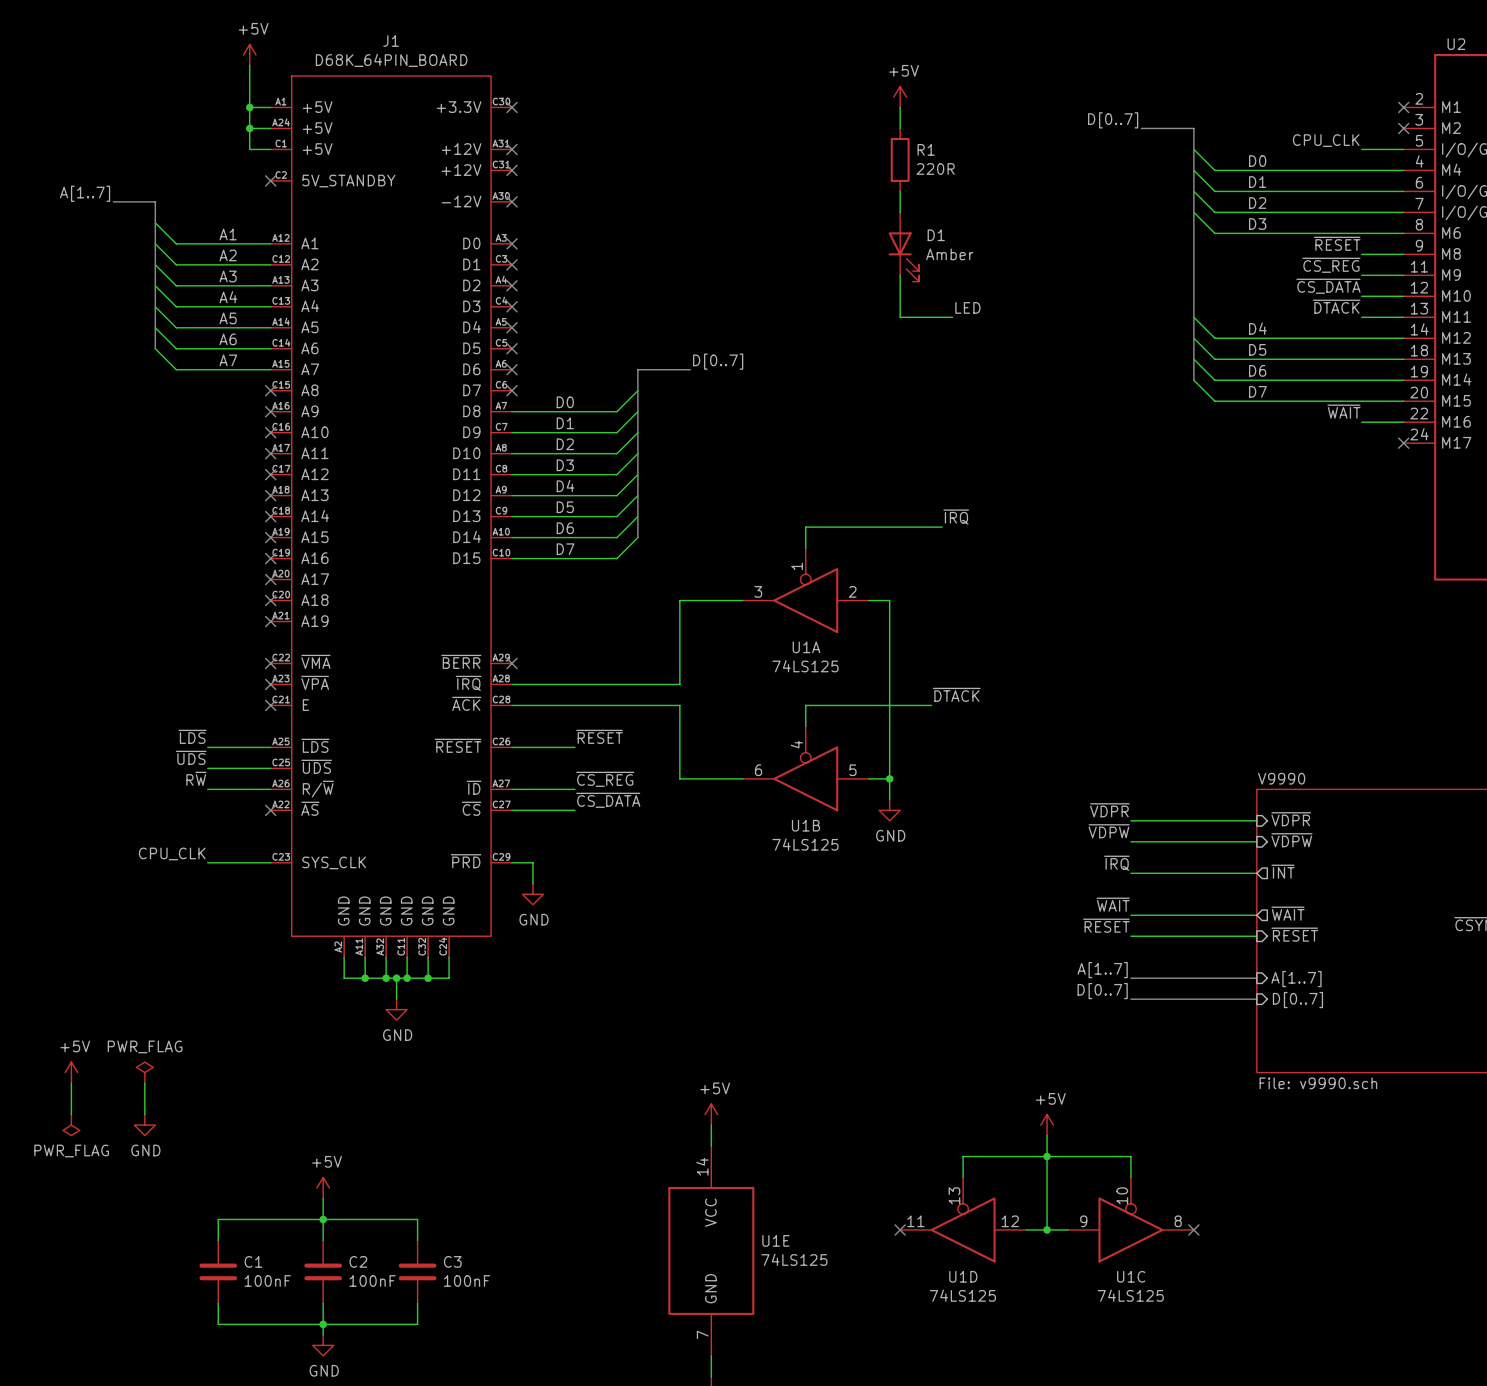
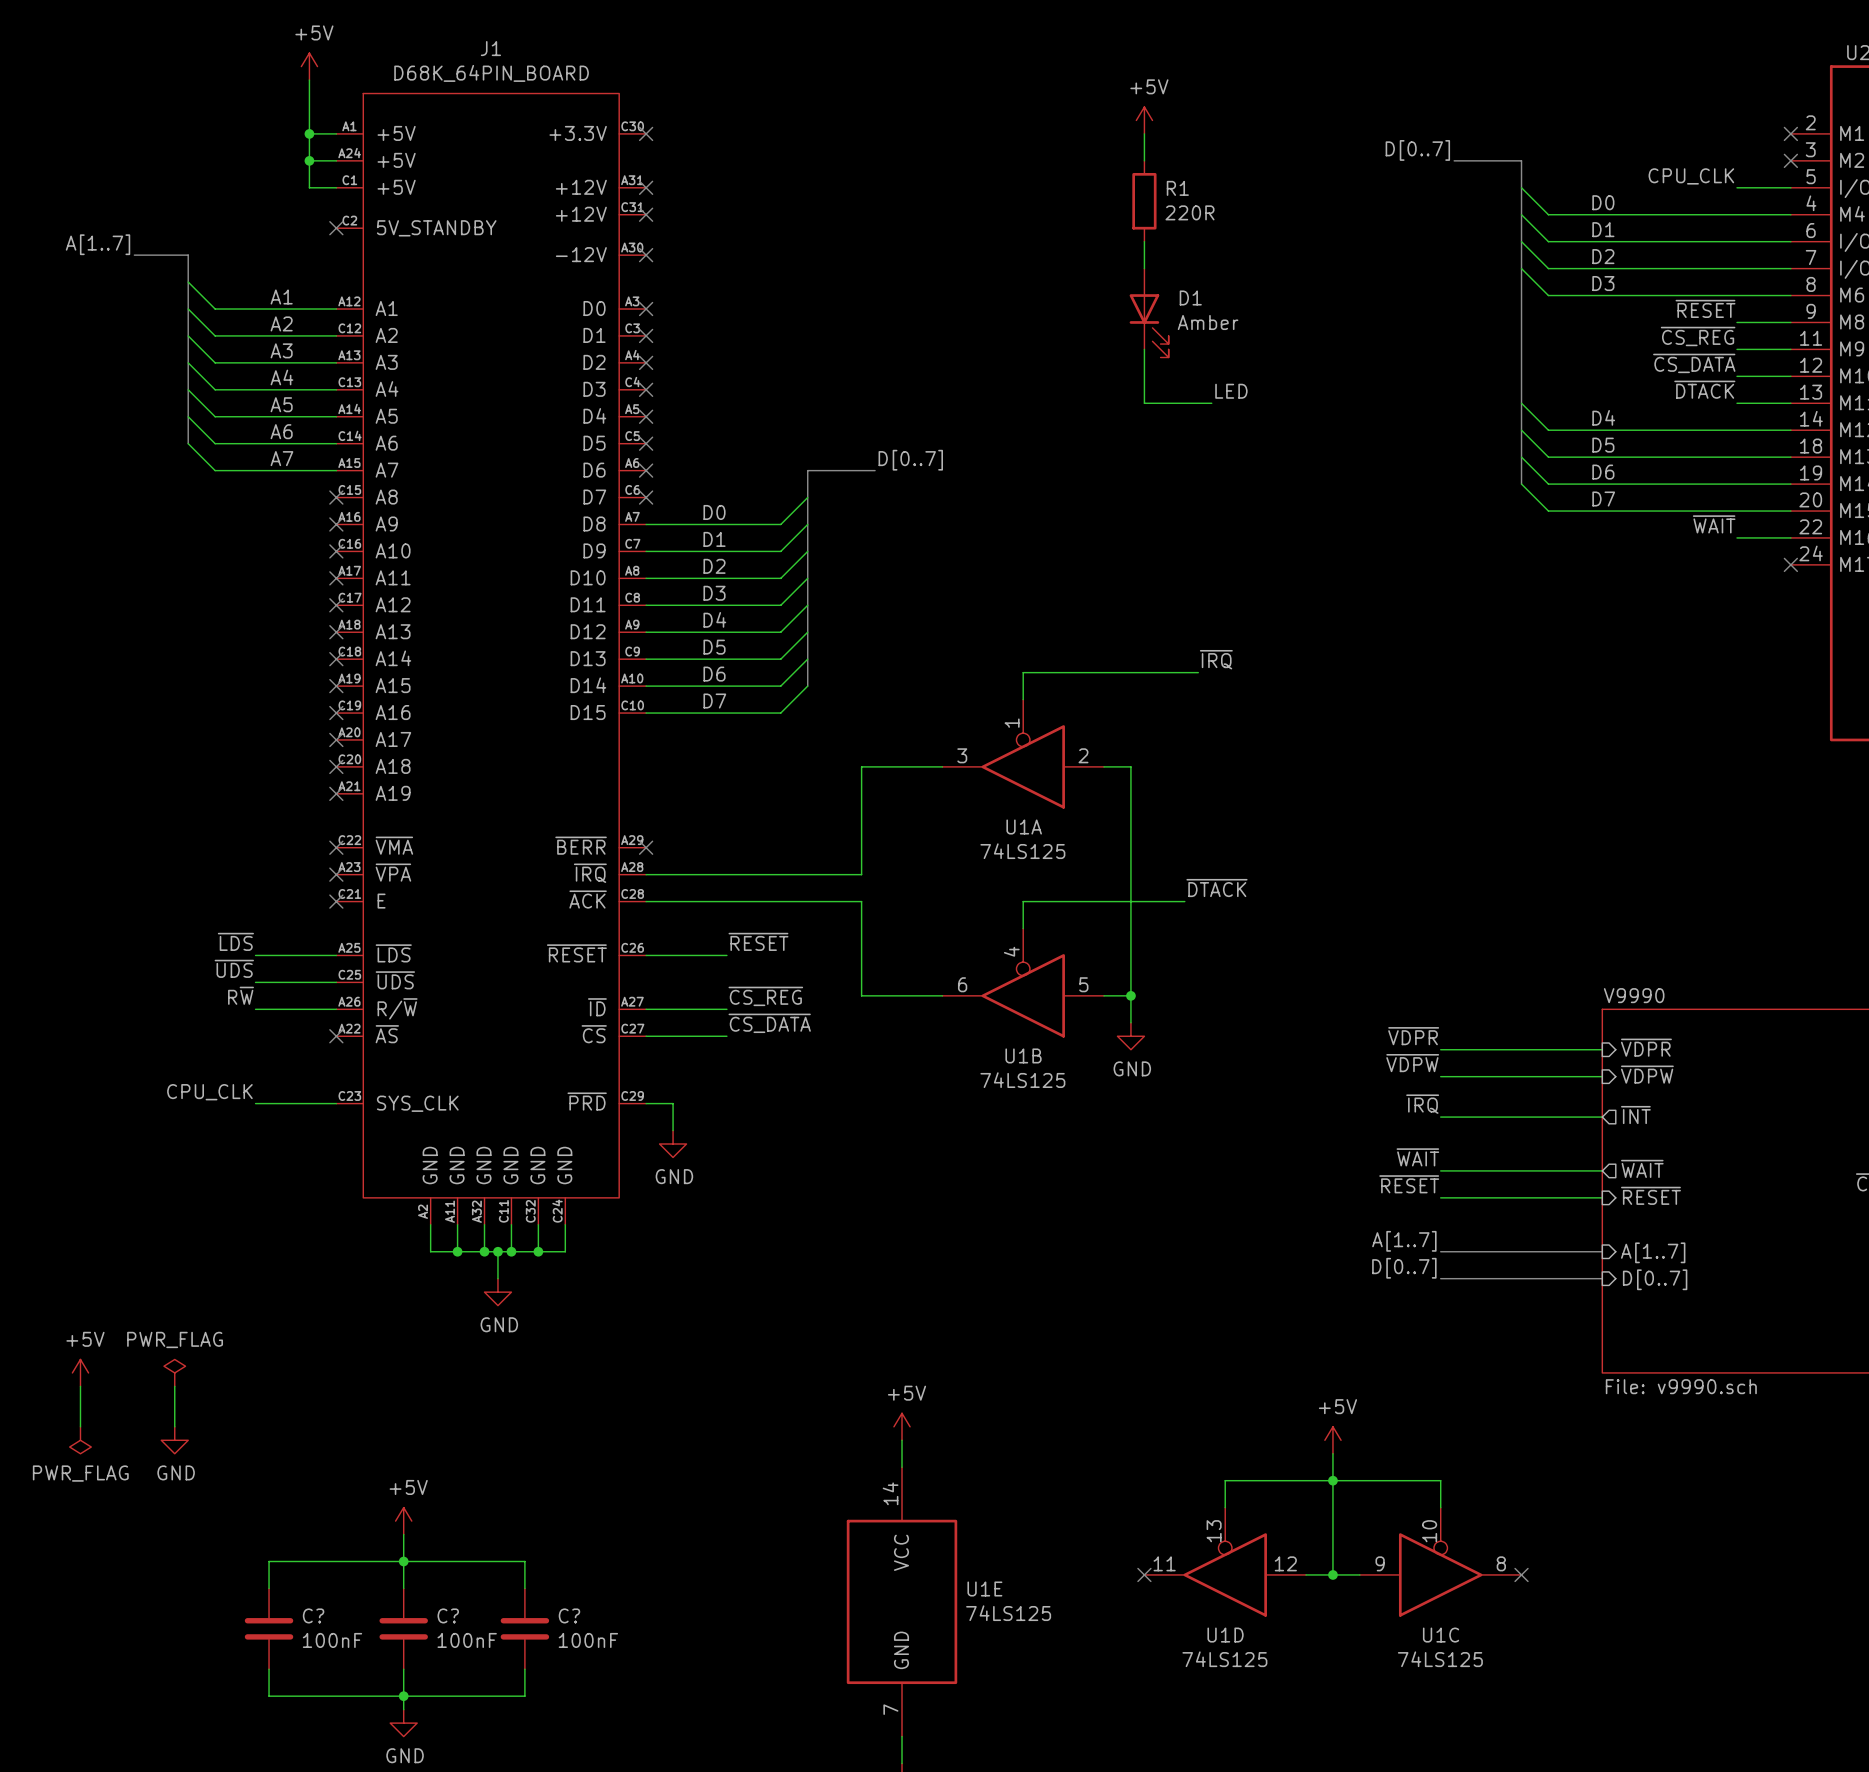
C1 name: C1 (253, 1261) -> C? (313, 1615)
C2 name: C2 (358, 1261) -> C? (448, 1615)
C3 name: C3 (452, 1261) -> C? (569, 1615)

